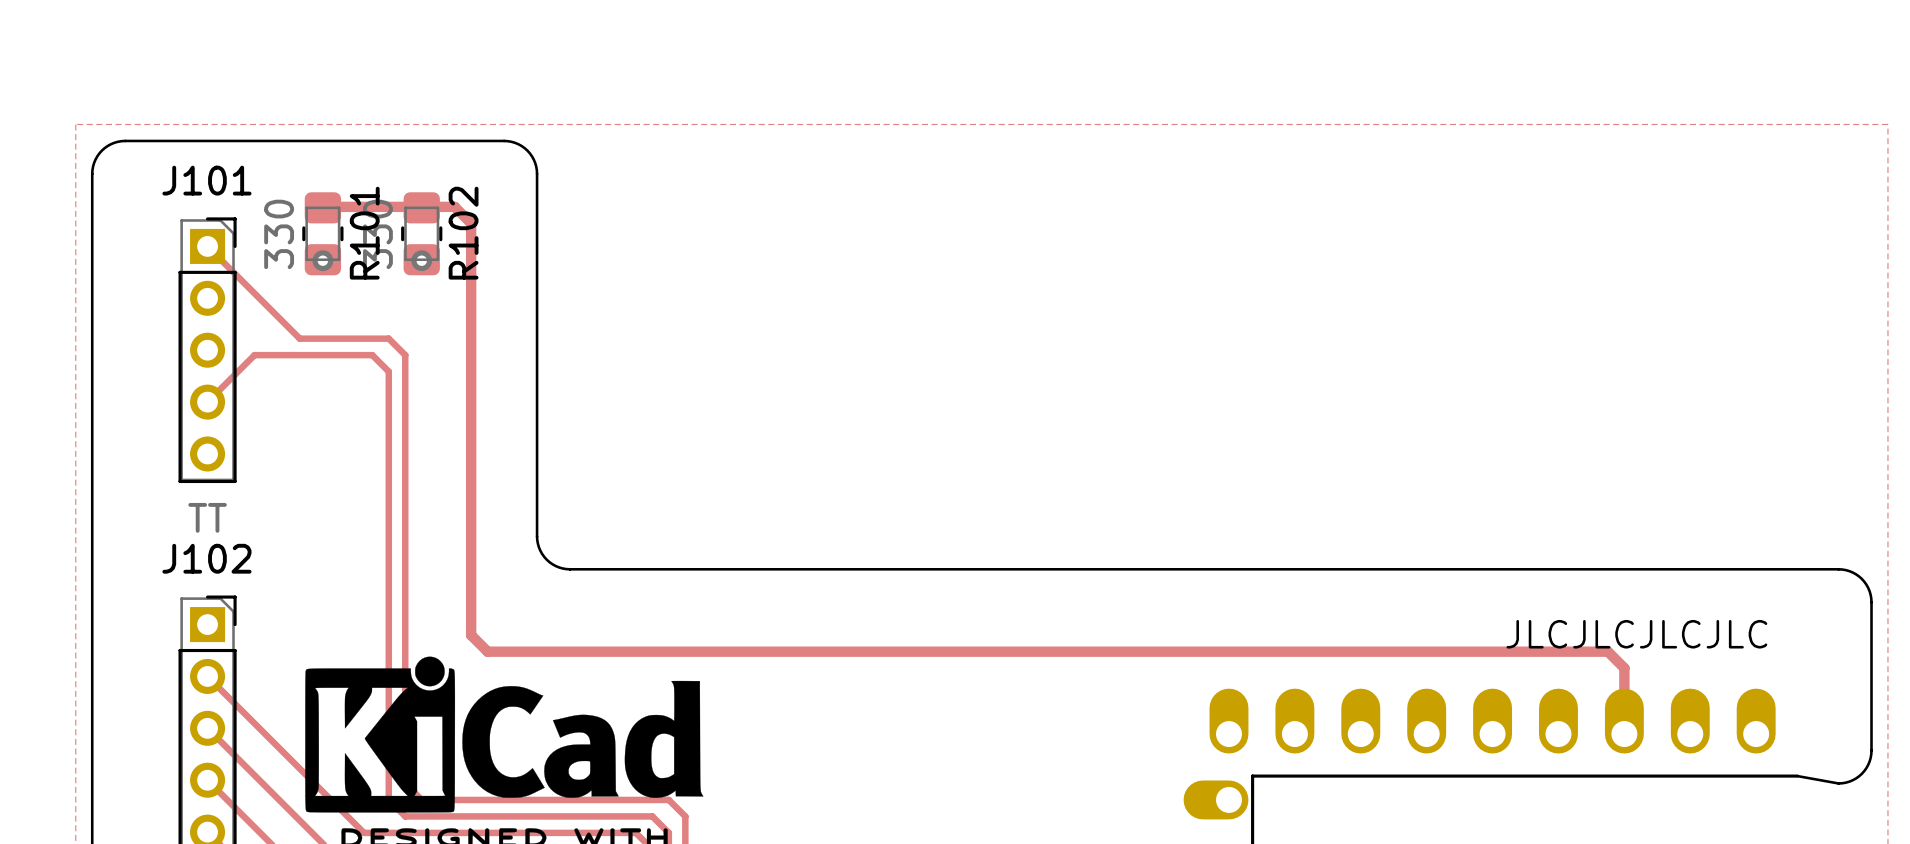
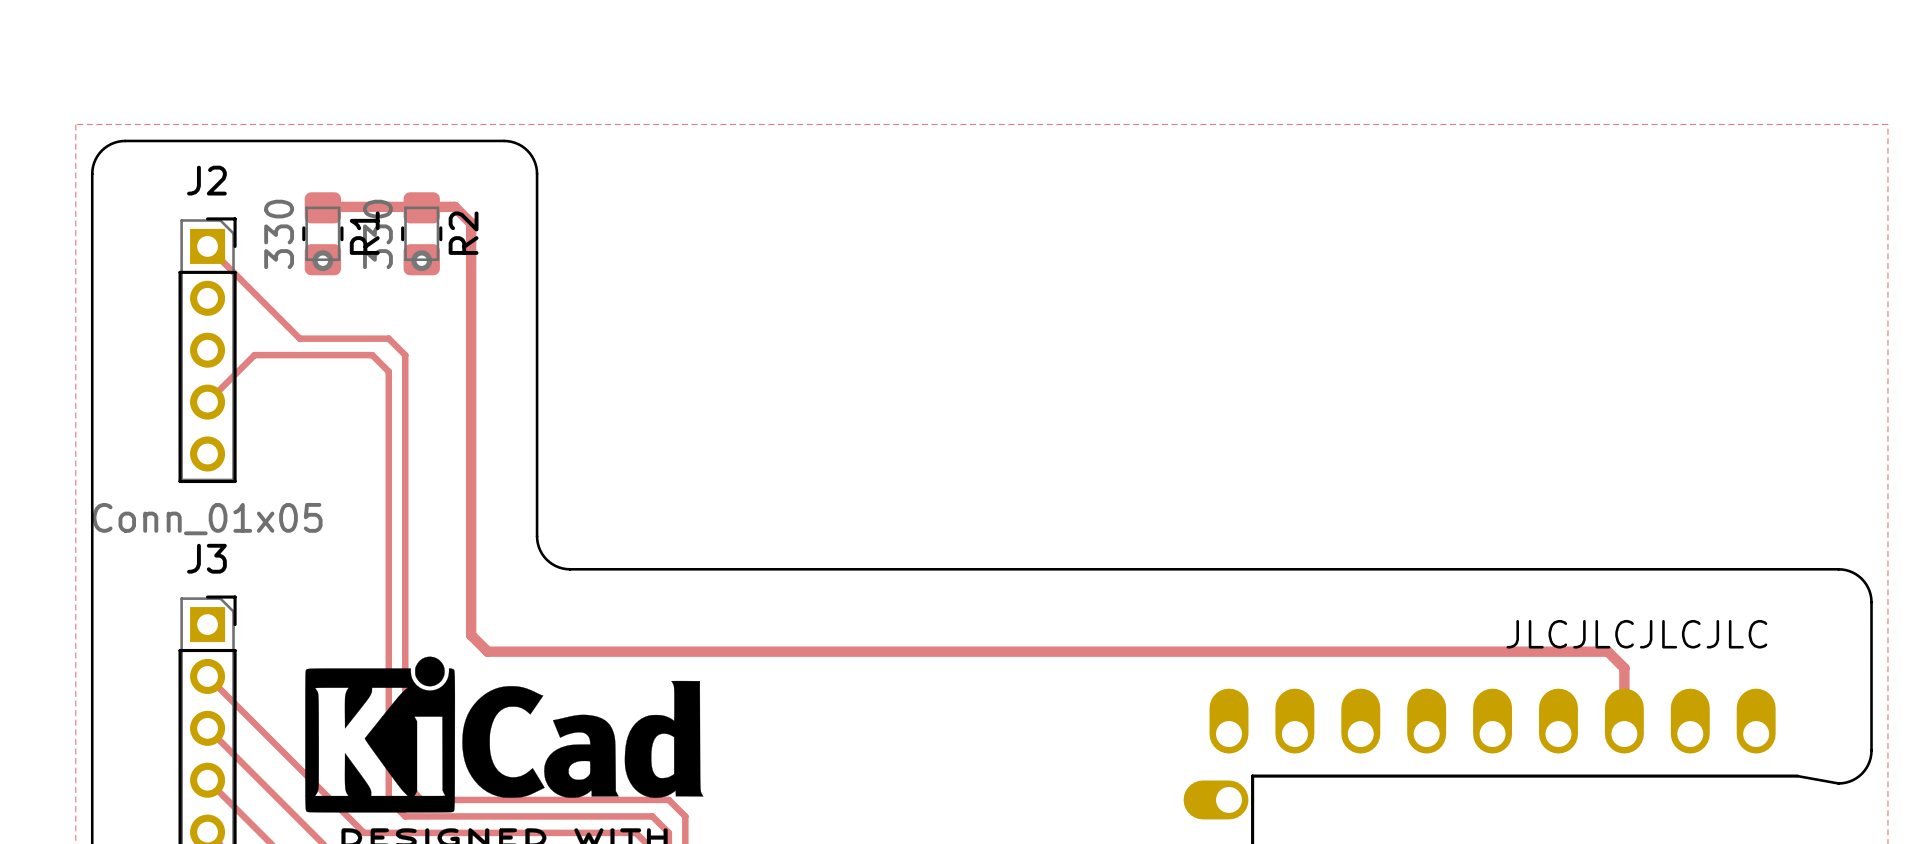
J101 name: J101 (206, 180) -> J2 (206, 180)
R101 name: R101 (364, 233) -> R1 (364, 233)
R102 name: R102 (463, 233) -> R2 (463, 233)
J101 value: TT (207, 517) -> Conn_01x05 (207, 519)
J102 name: J102 (206, 558) -> J3 (206, 558)

